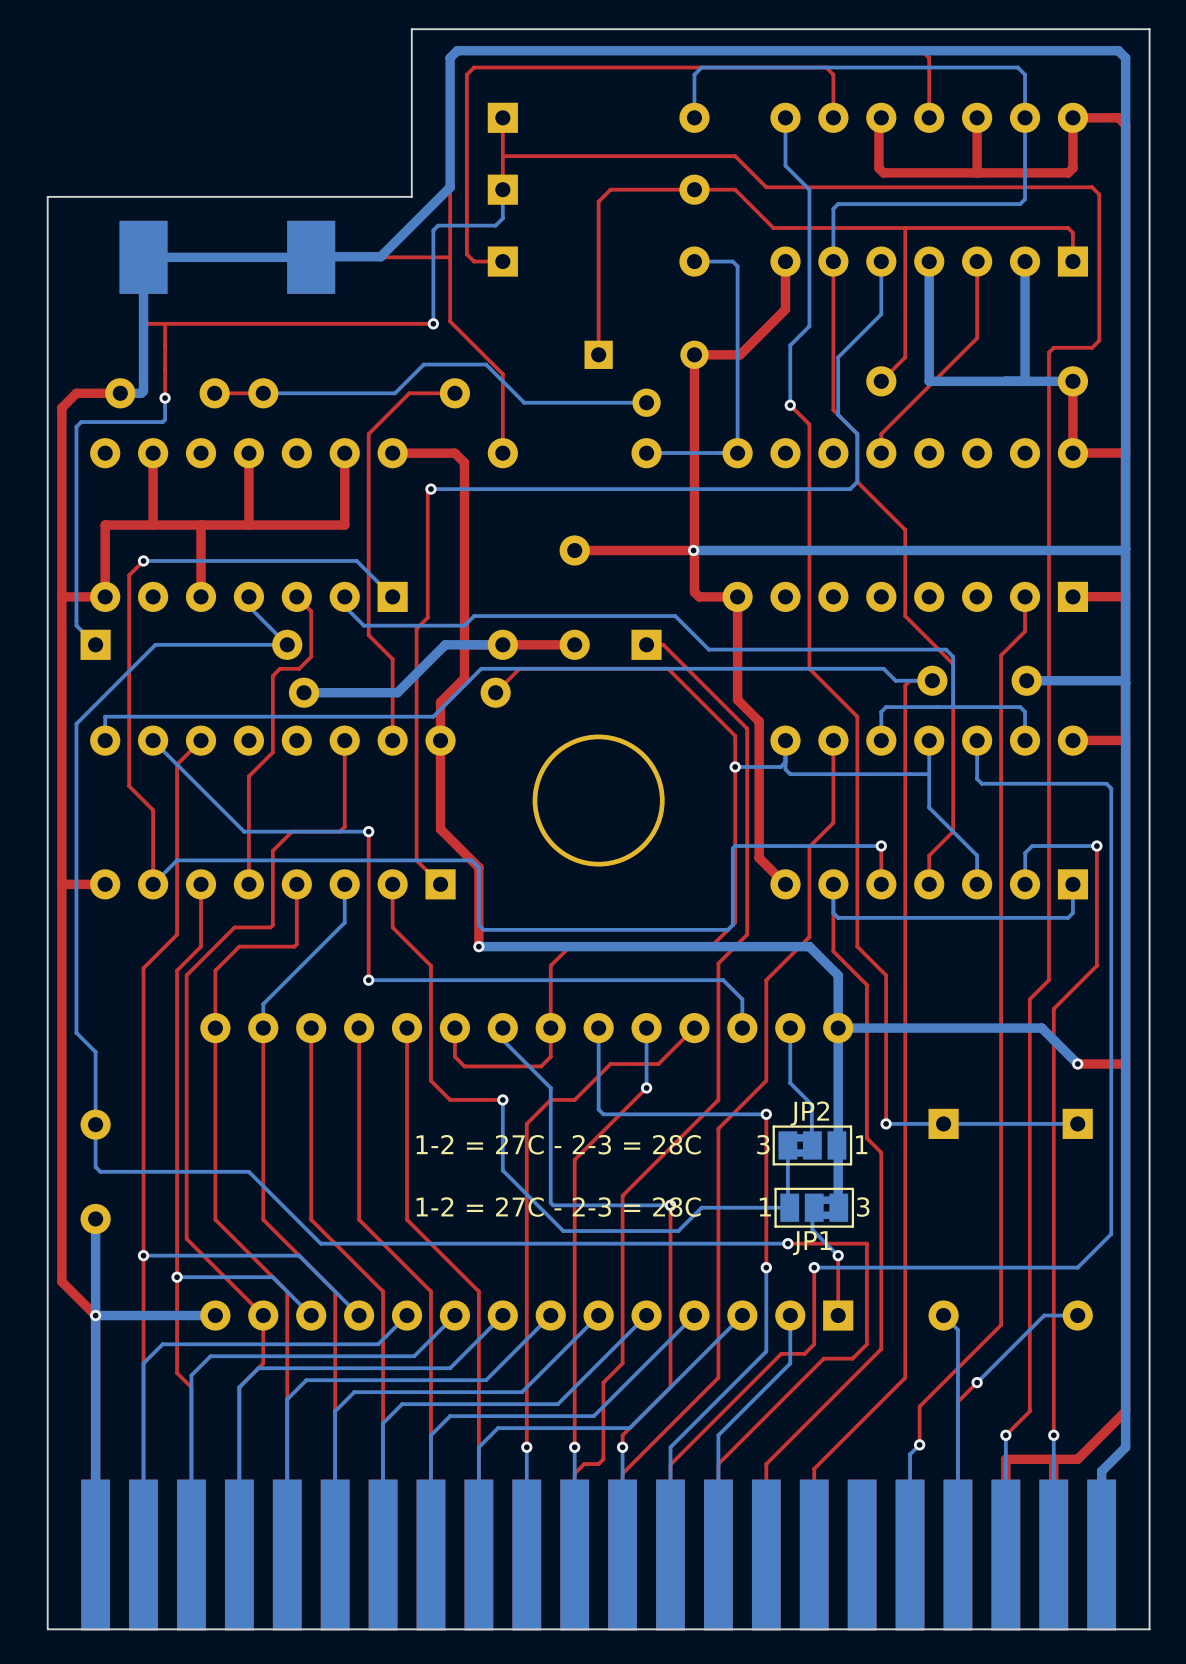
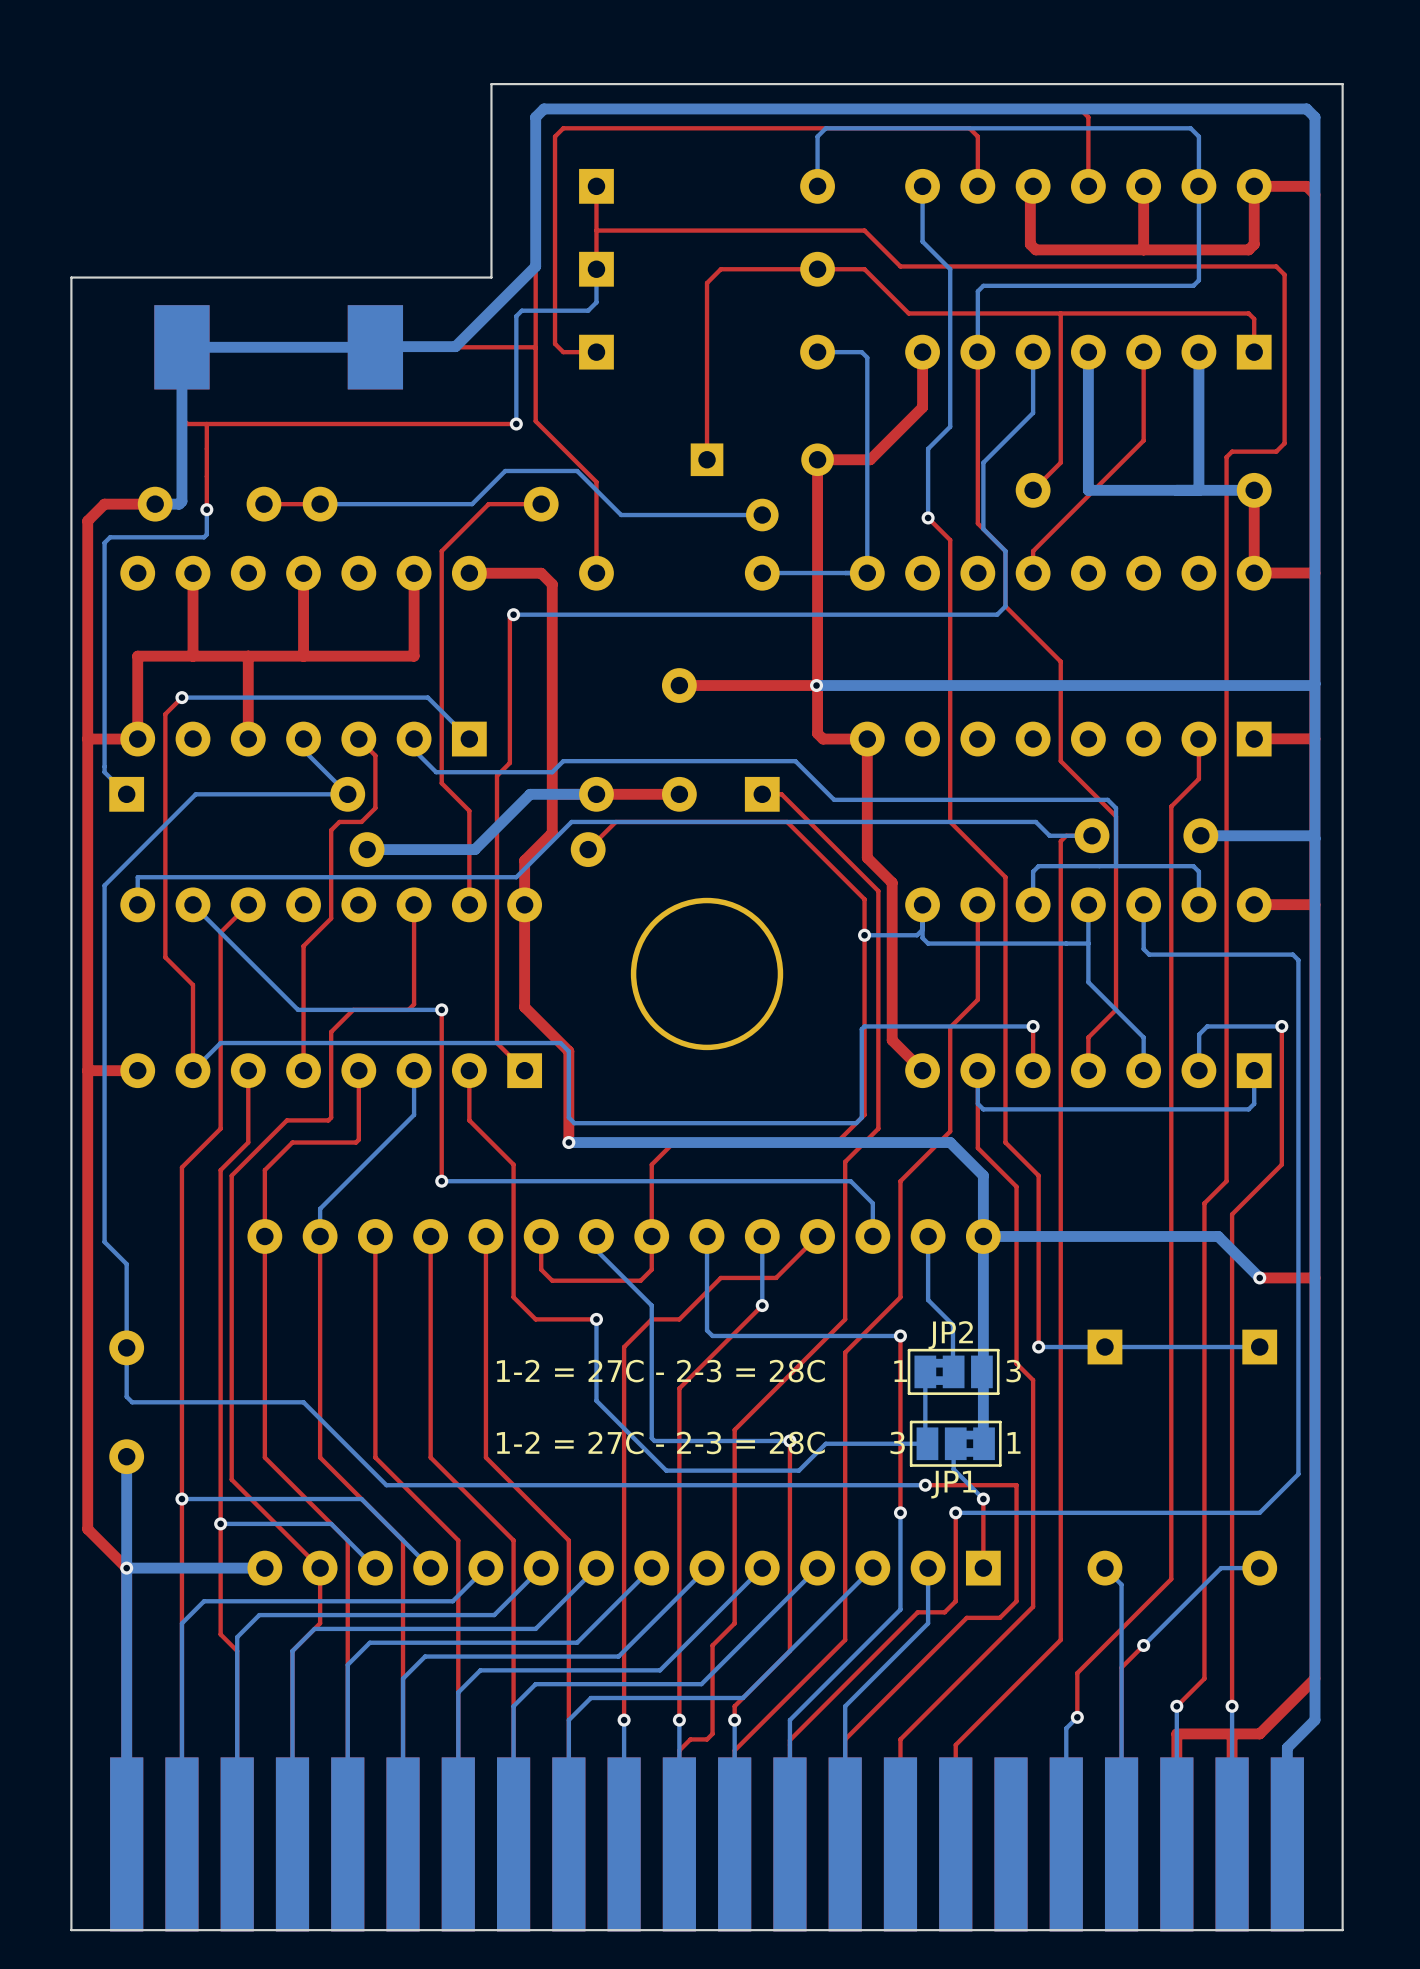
JP2 text position: 3 (763, 1144) -> 3 (1013, 1371)
JP2 text position: 1 (861, 1144) -> 1 (900, 1371)
JP1 text position: 1 (765, 1207) -> 1 (1014, 1442)
JP1 text position: 3 (863, 1207) -> 3 (897, 1442)

